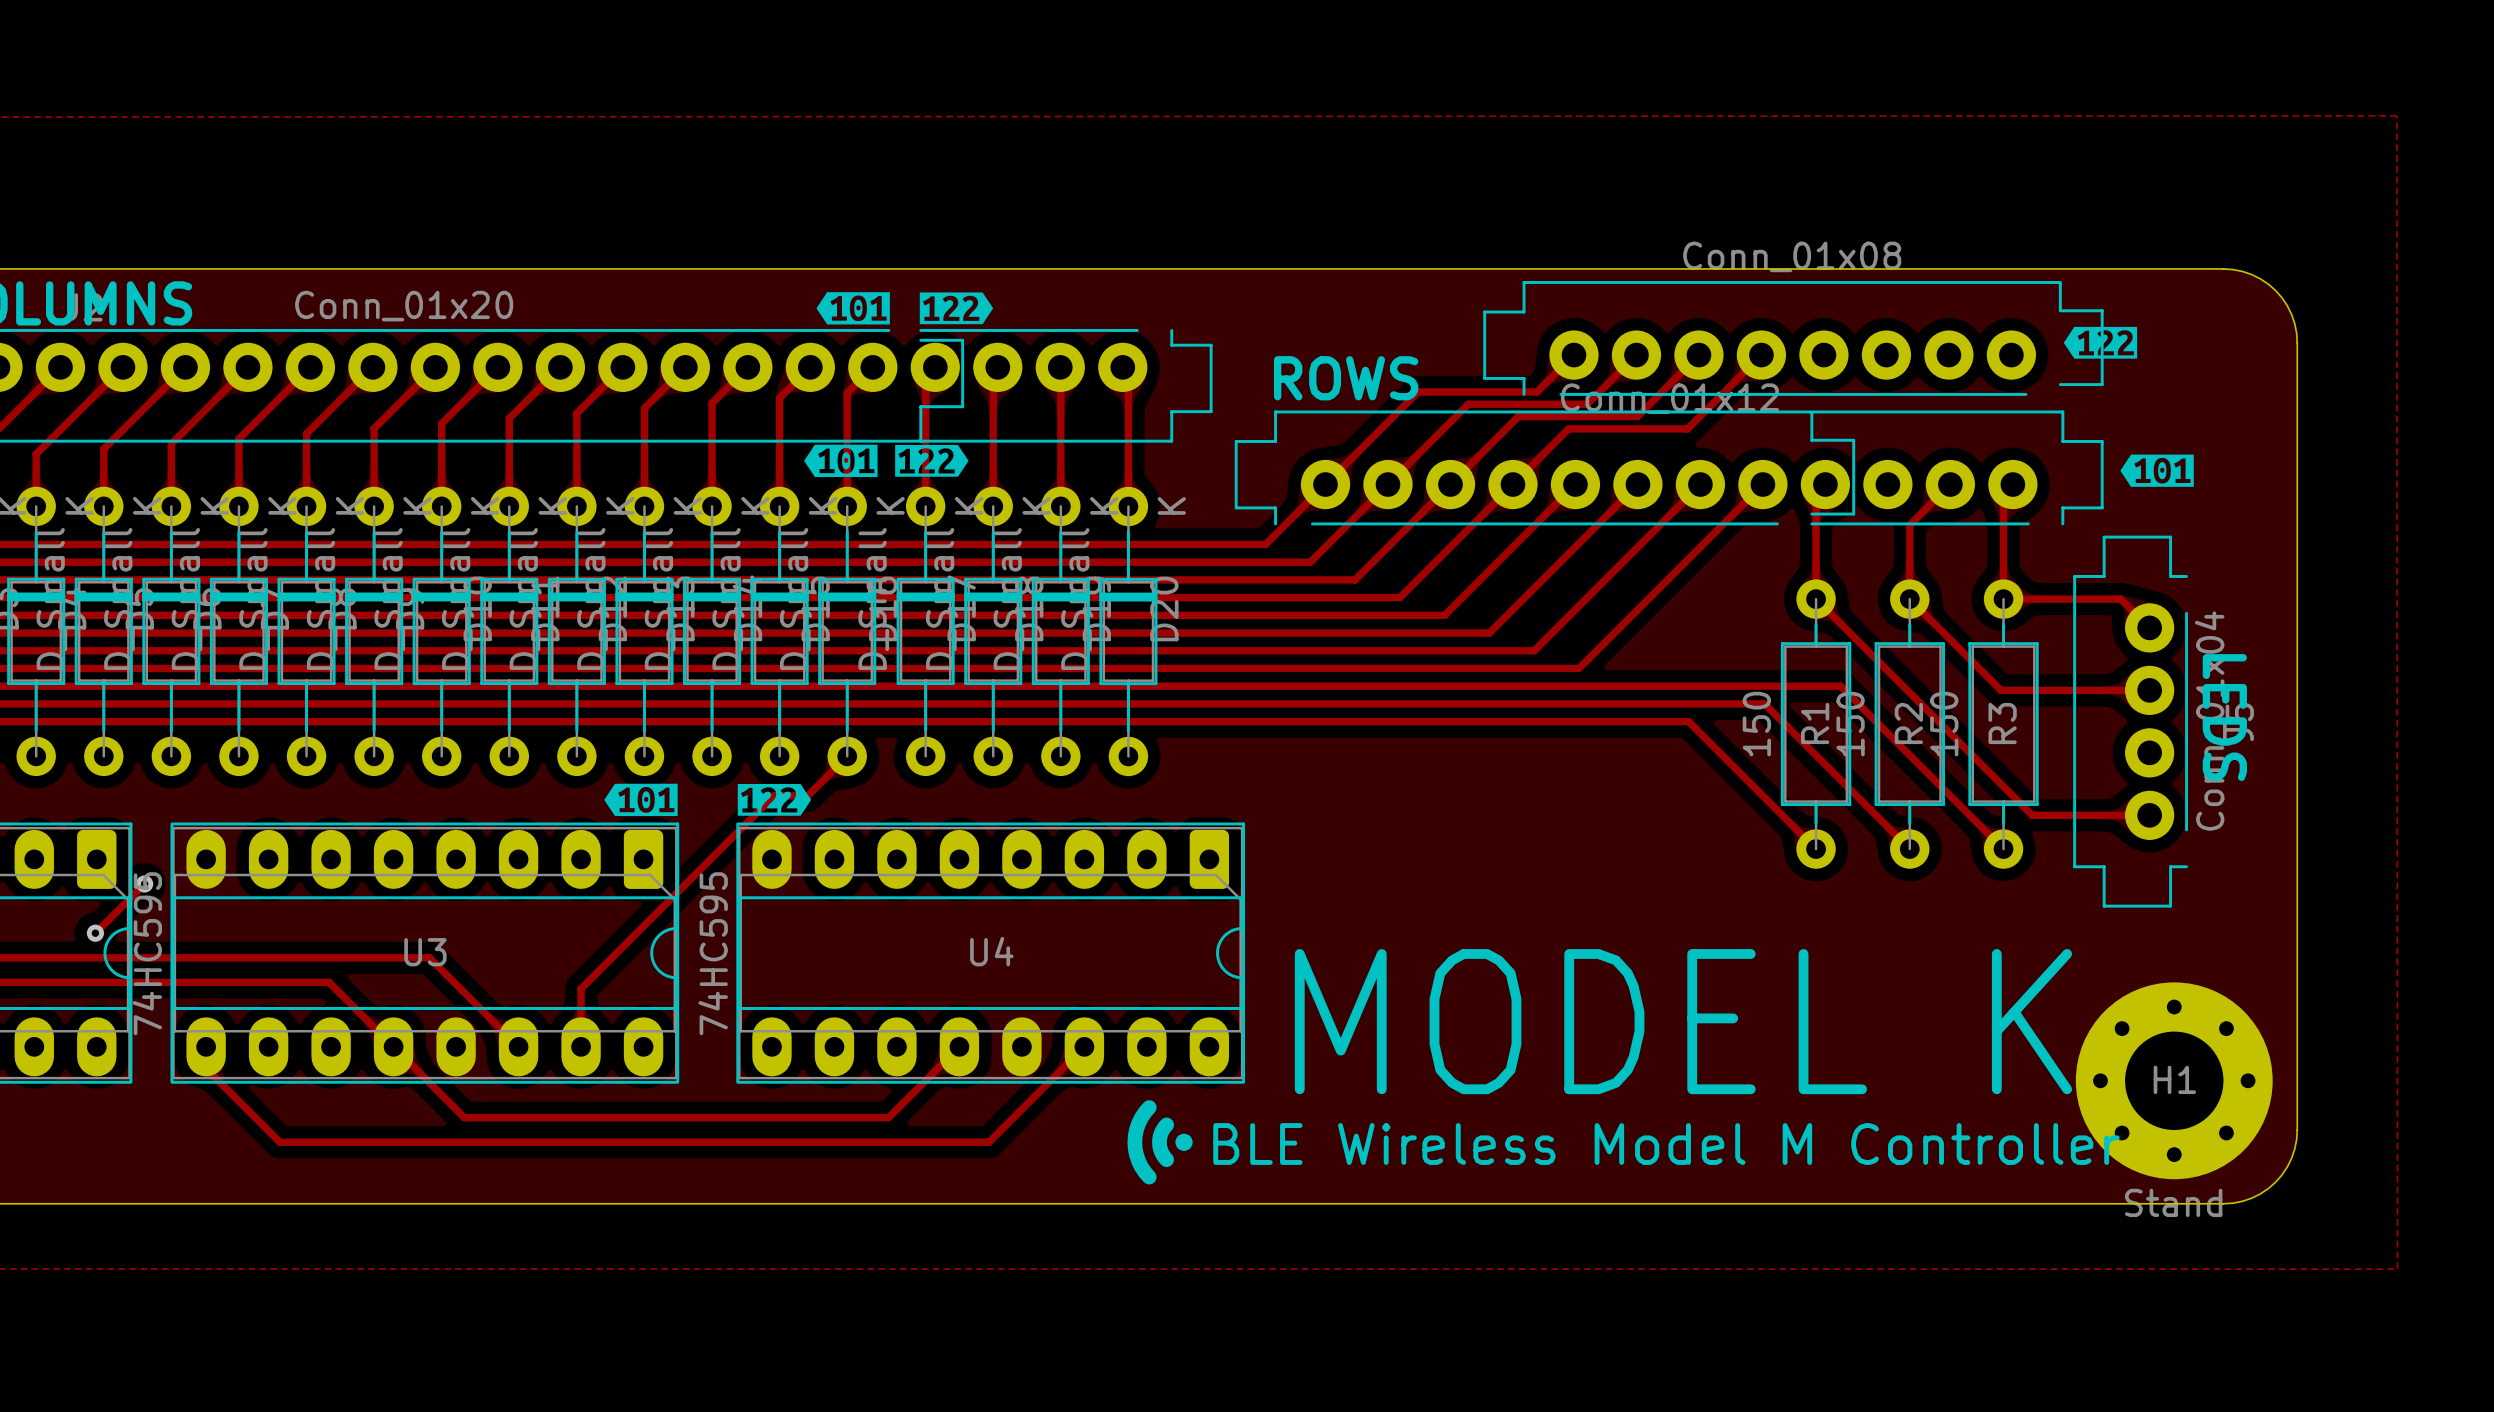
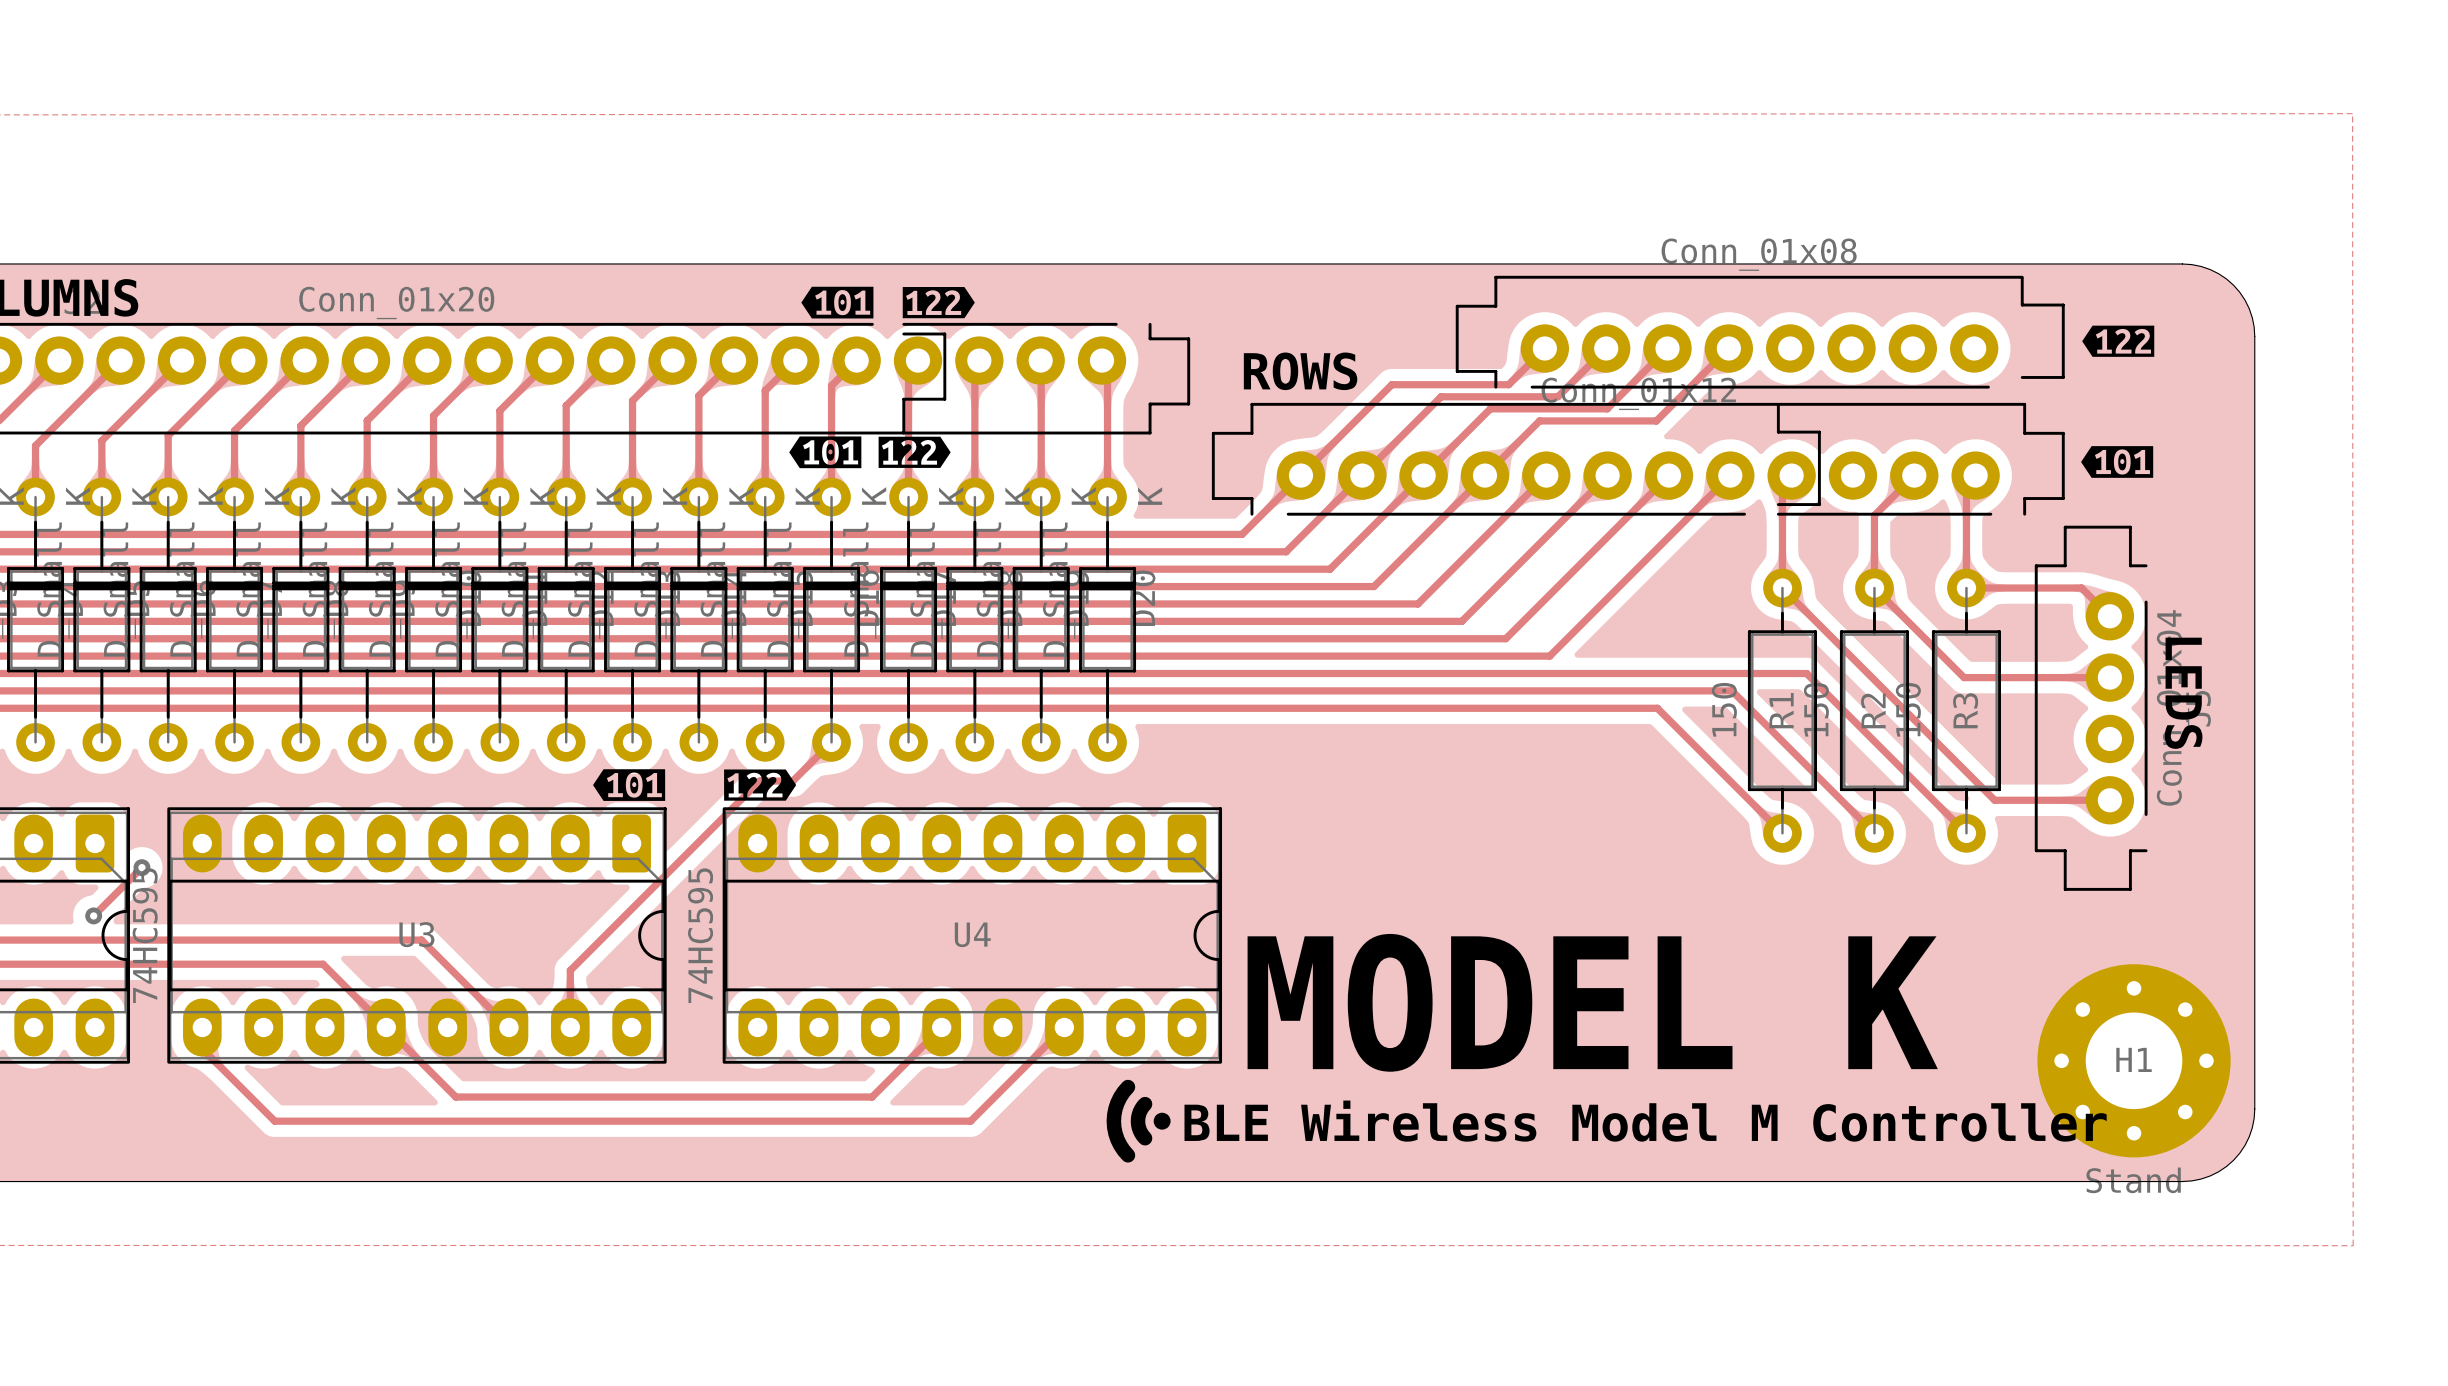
drawing position: (2100, 342) -> (2118, 341)

